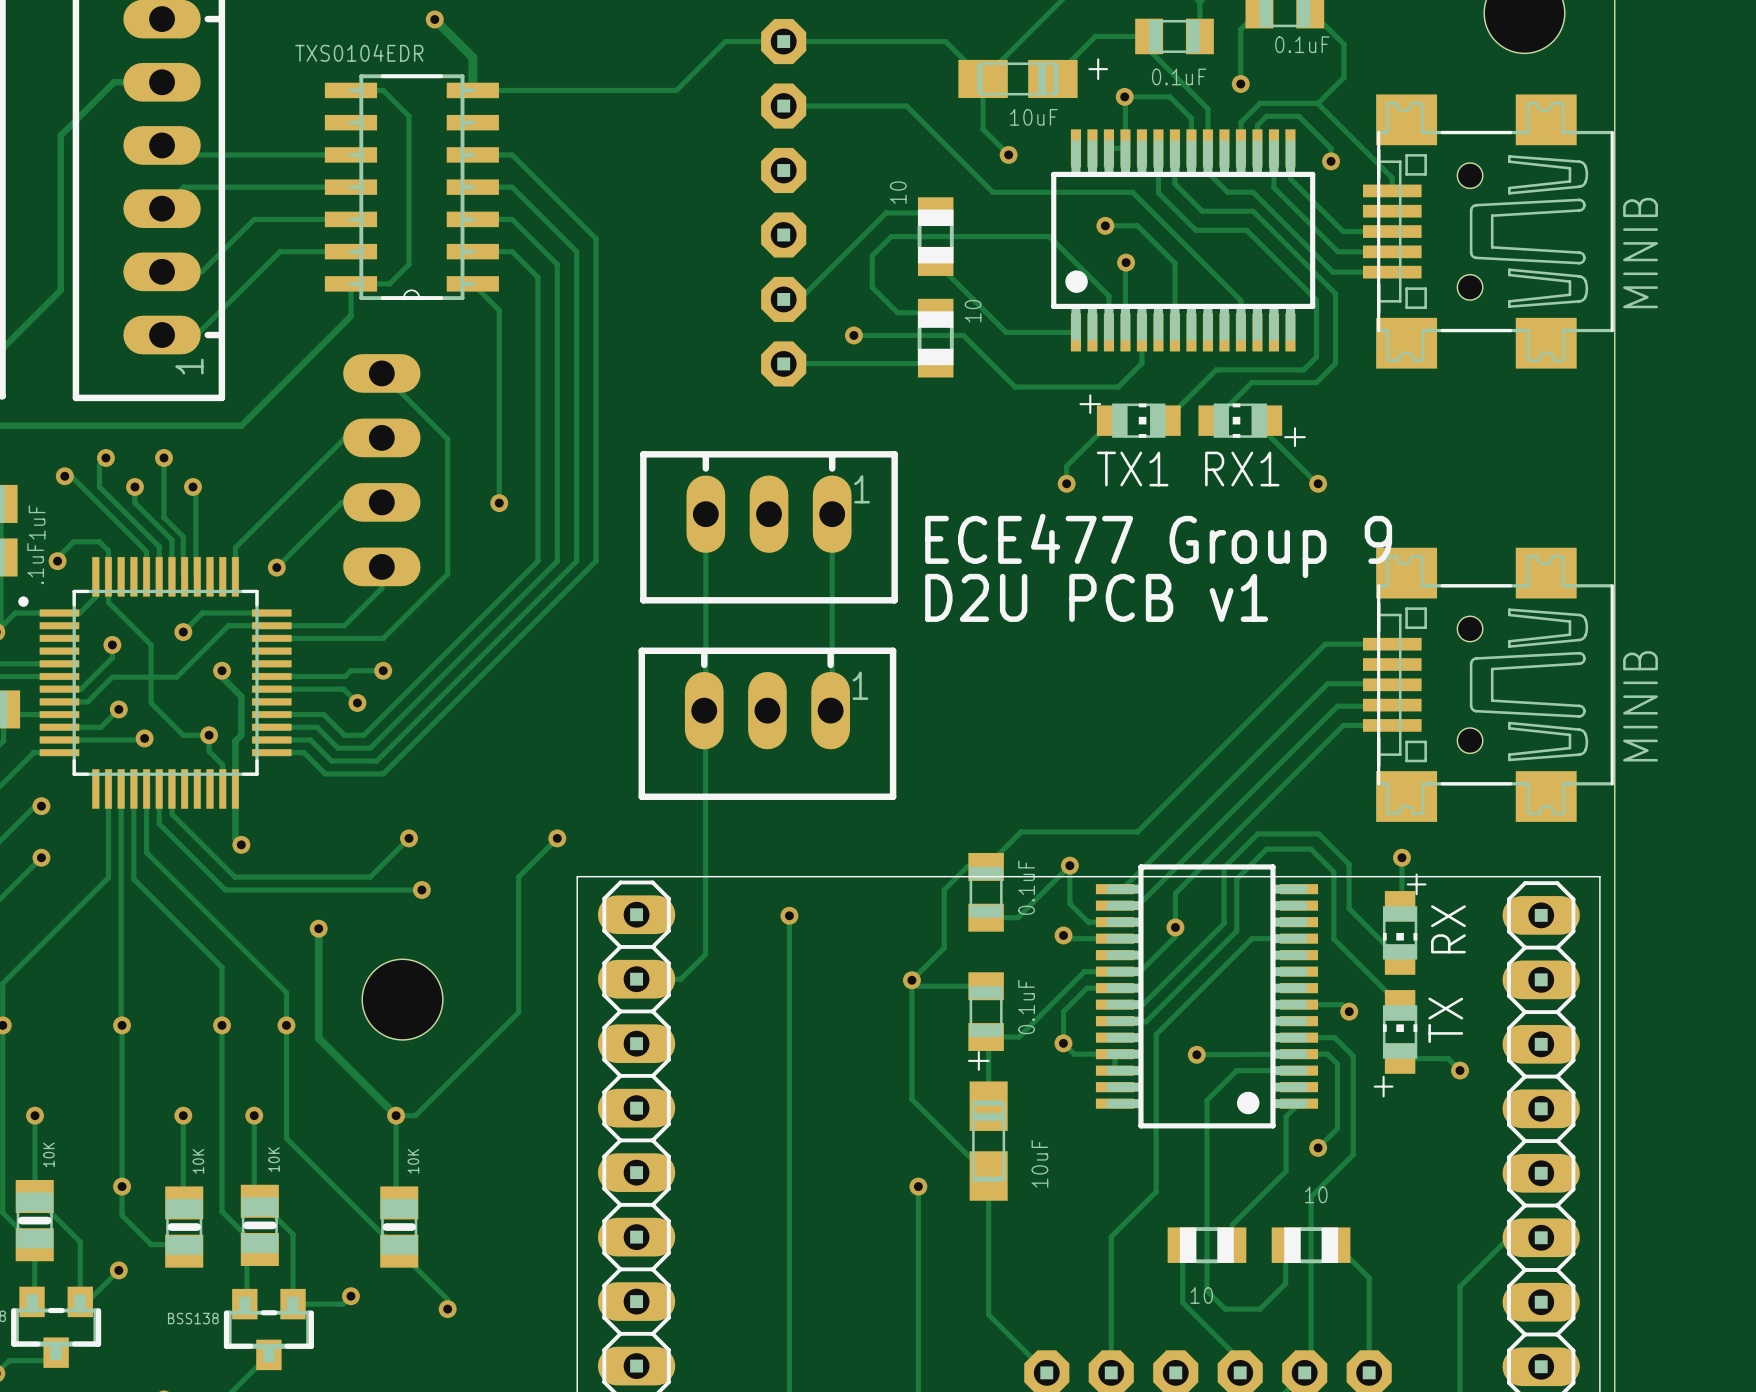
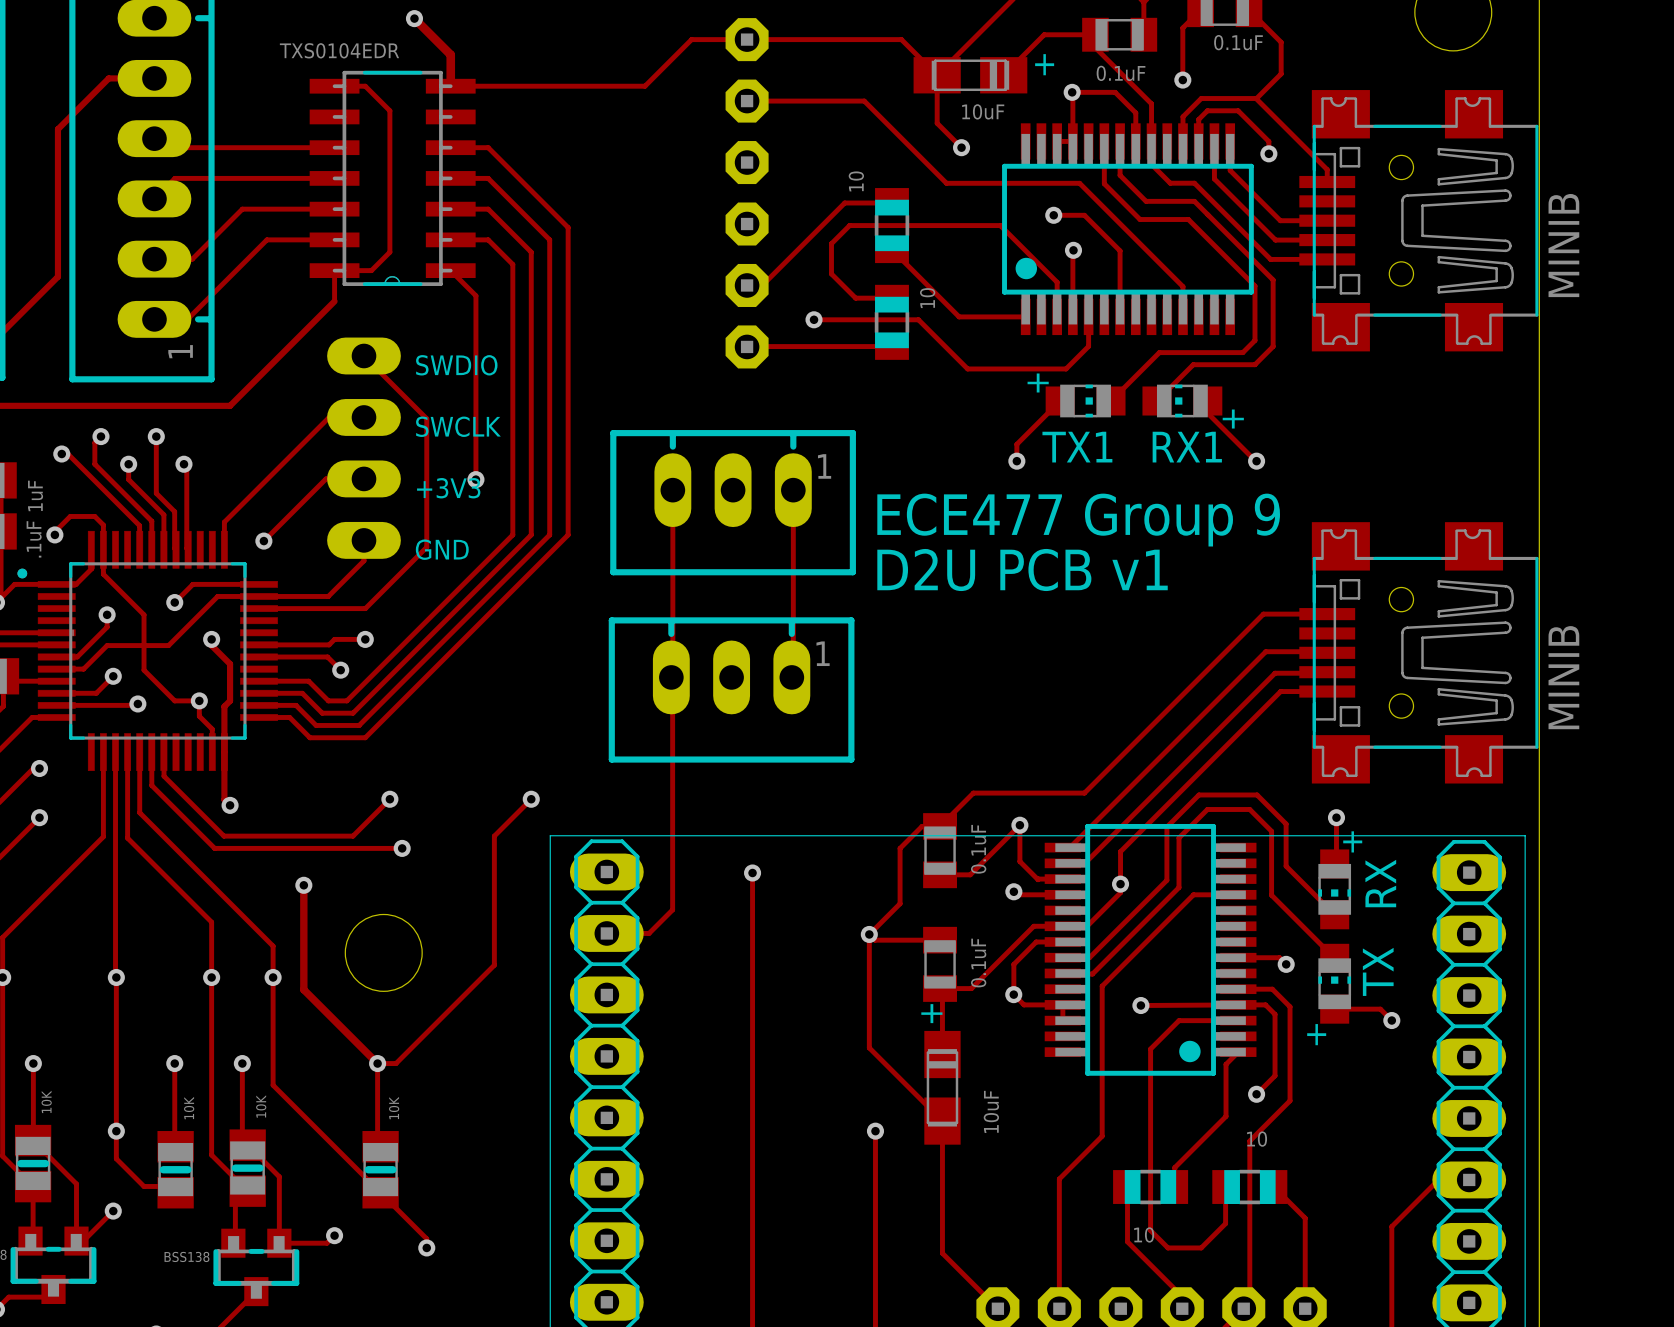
text: none -> SWDIO (456, 365)
text: none -> SWCLK (458, 426)
text: none -> +3V3 (448, 488)
text: none -> GND (442, 549)

